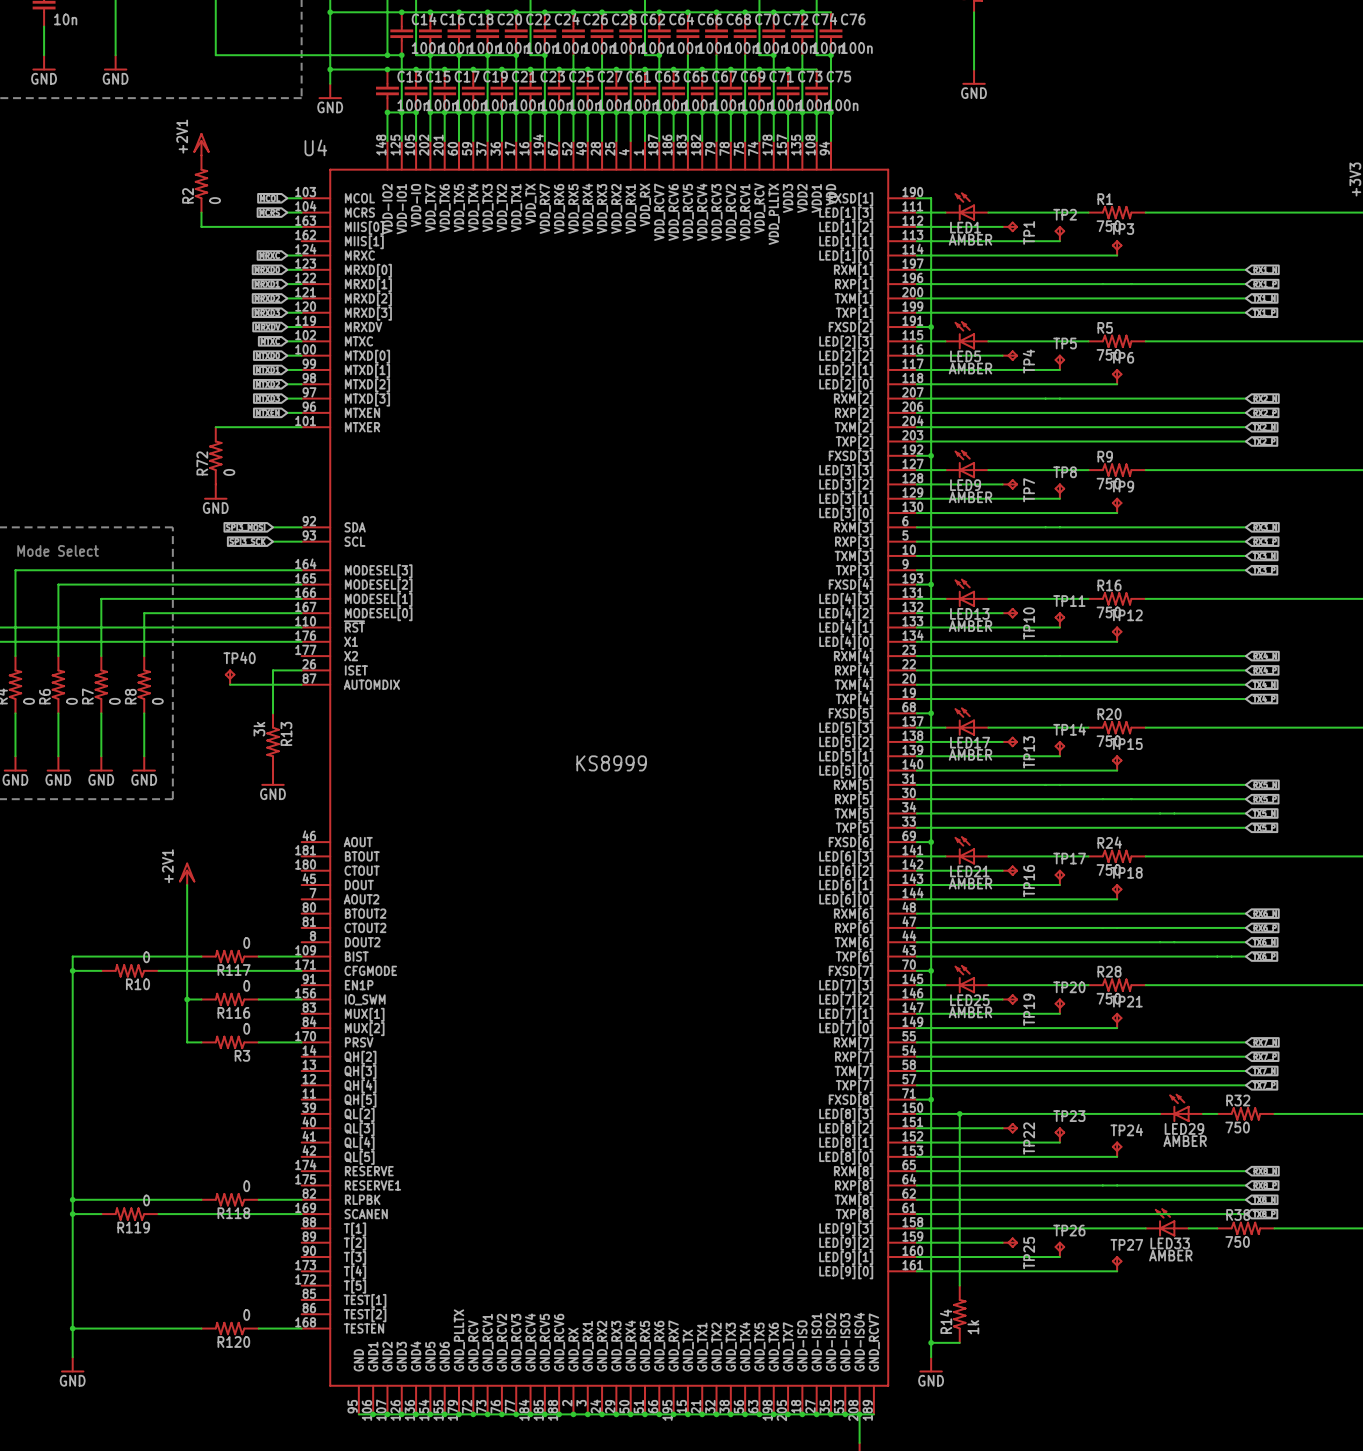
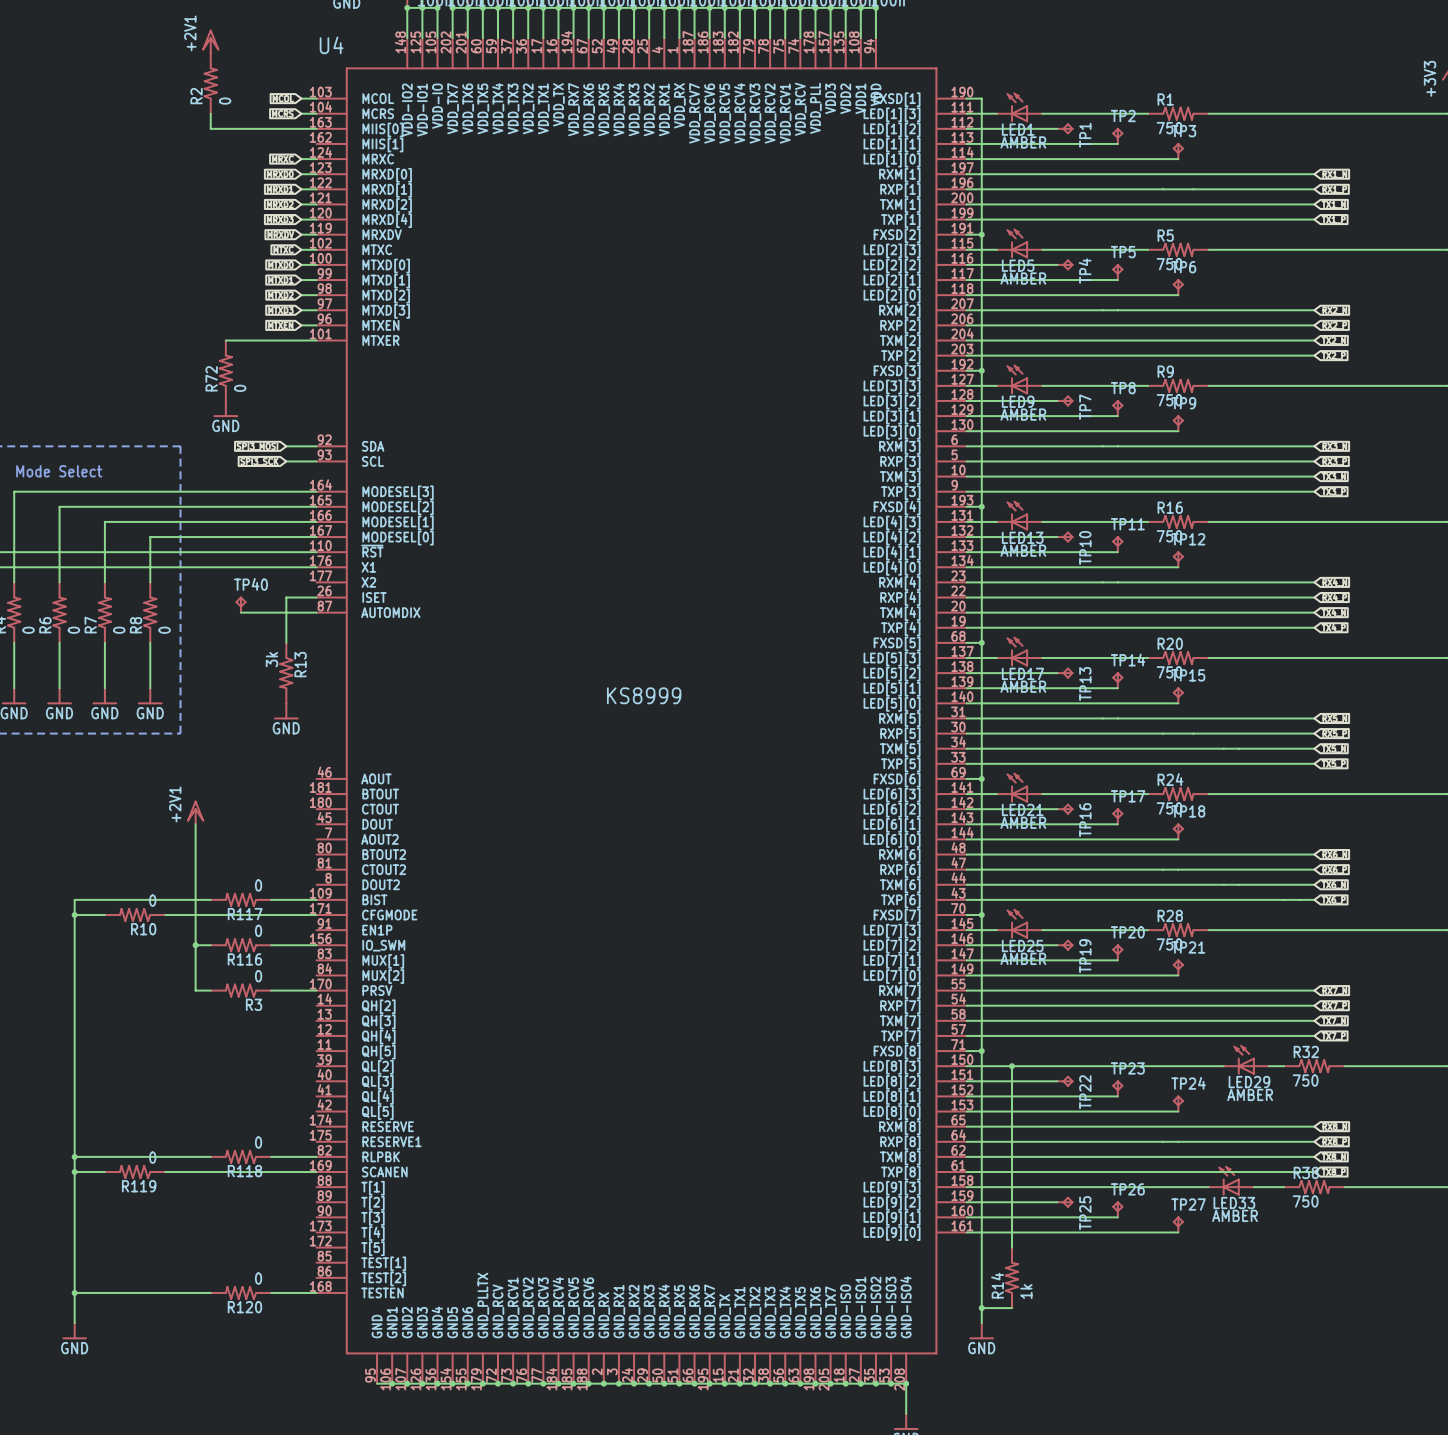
U4 symbol: [301, 141, 917, 1415] -> [316, 38, 967, 1384]
wire: (859, 1414) (873, 1414) -> none

